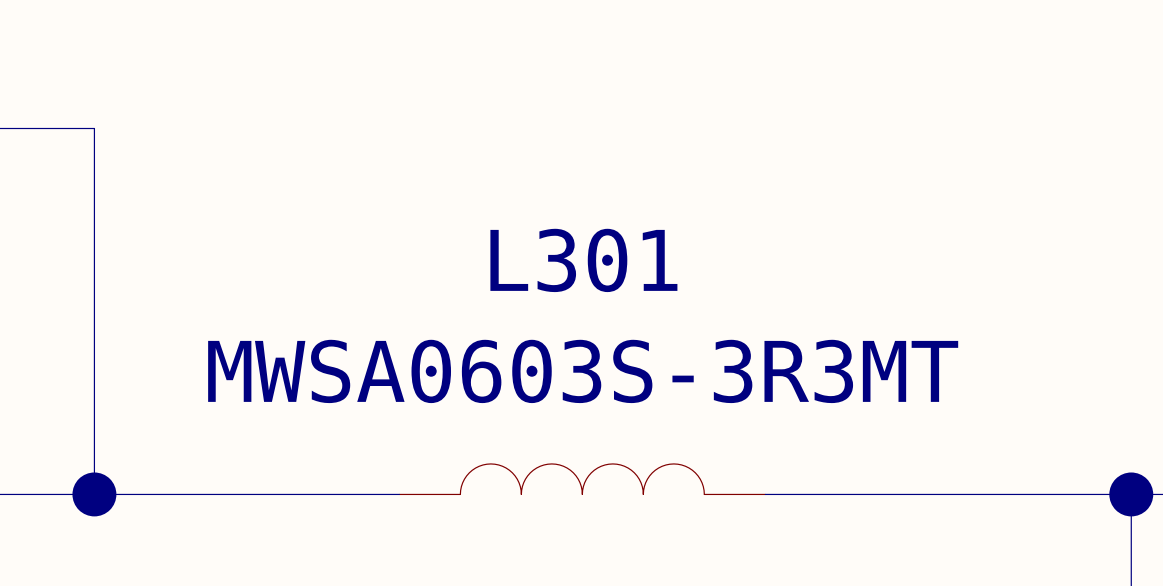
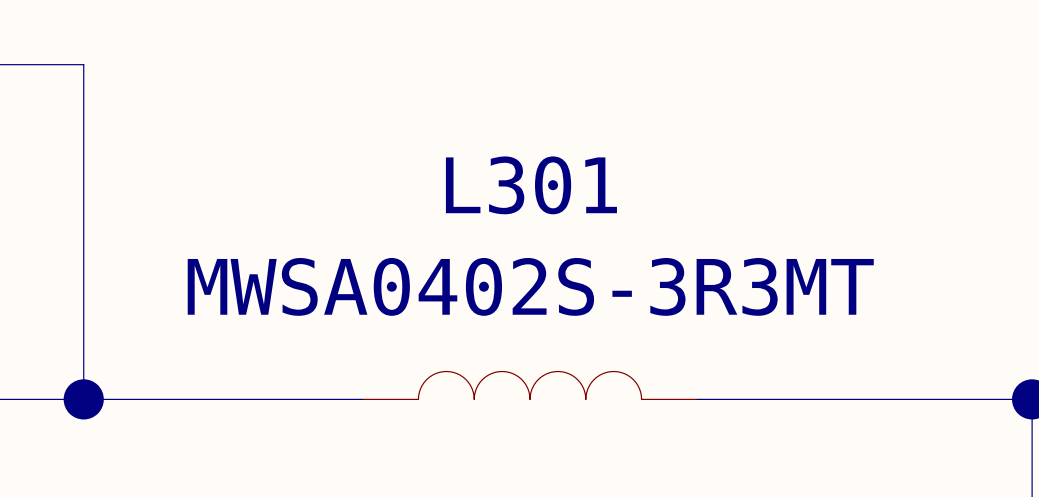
L301 value: MWSA0603S-3R3MT (583, 371) -> MWSA0402S-3R3MT (530, 286)

